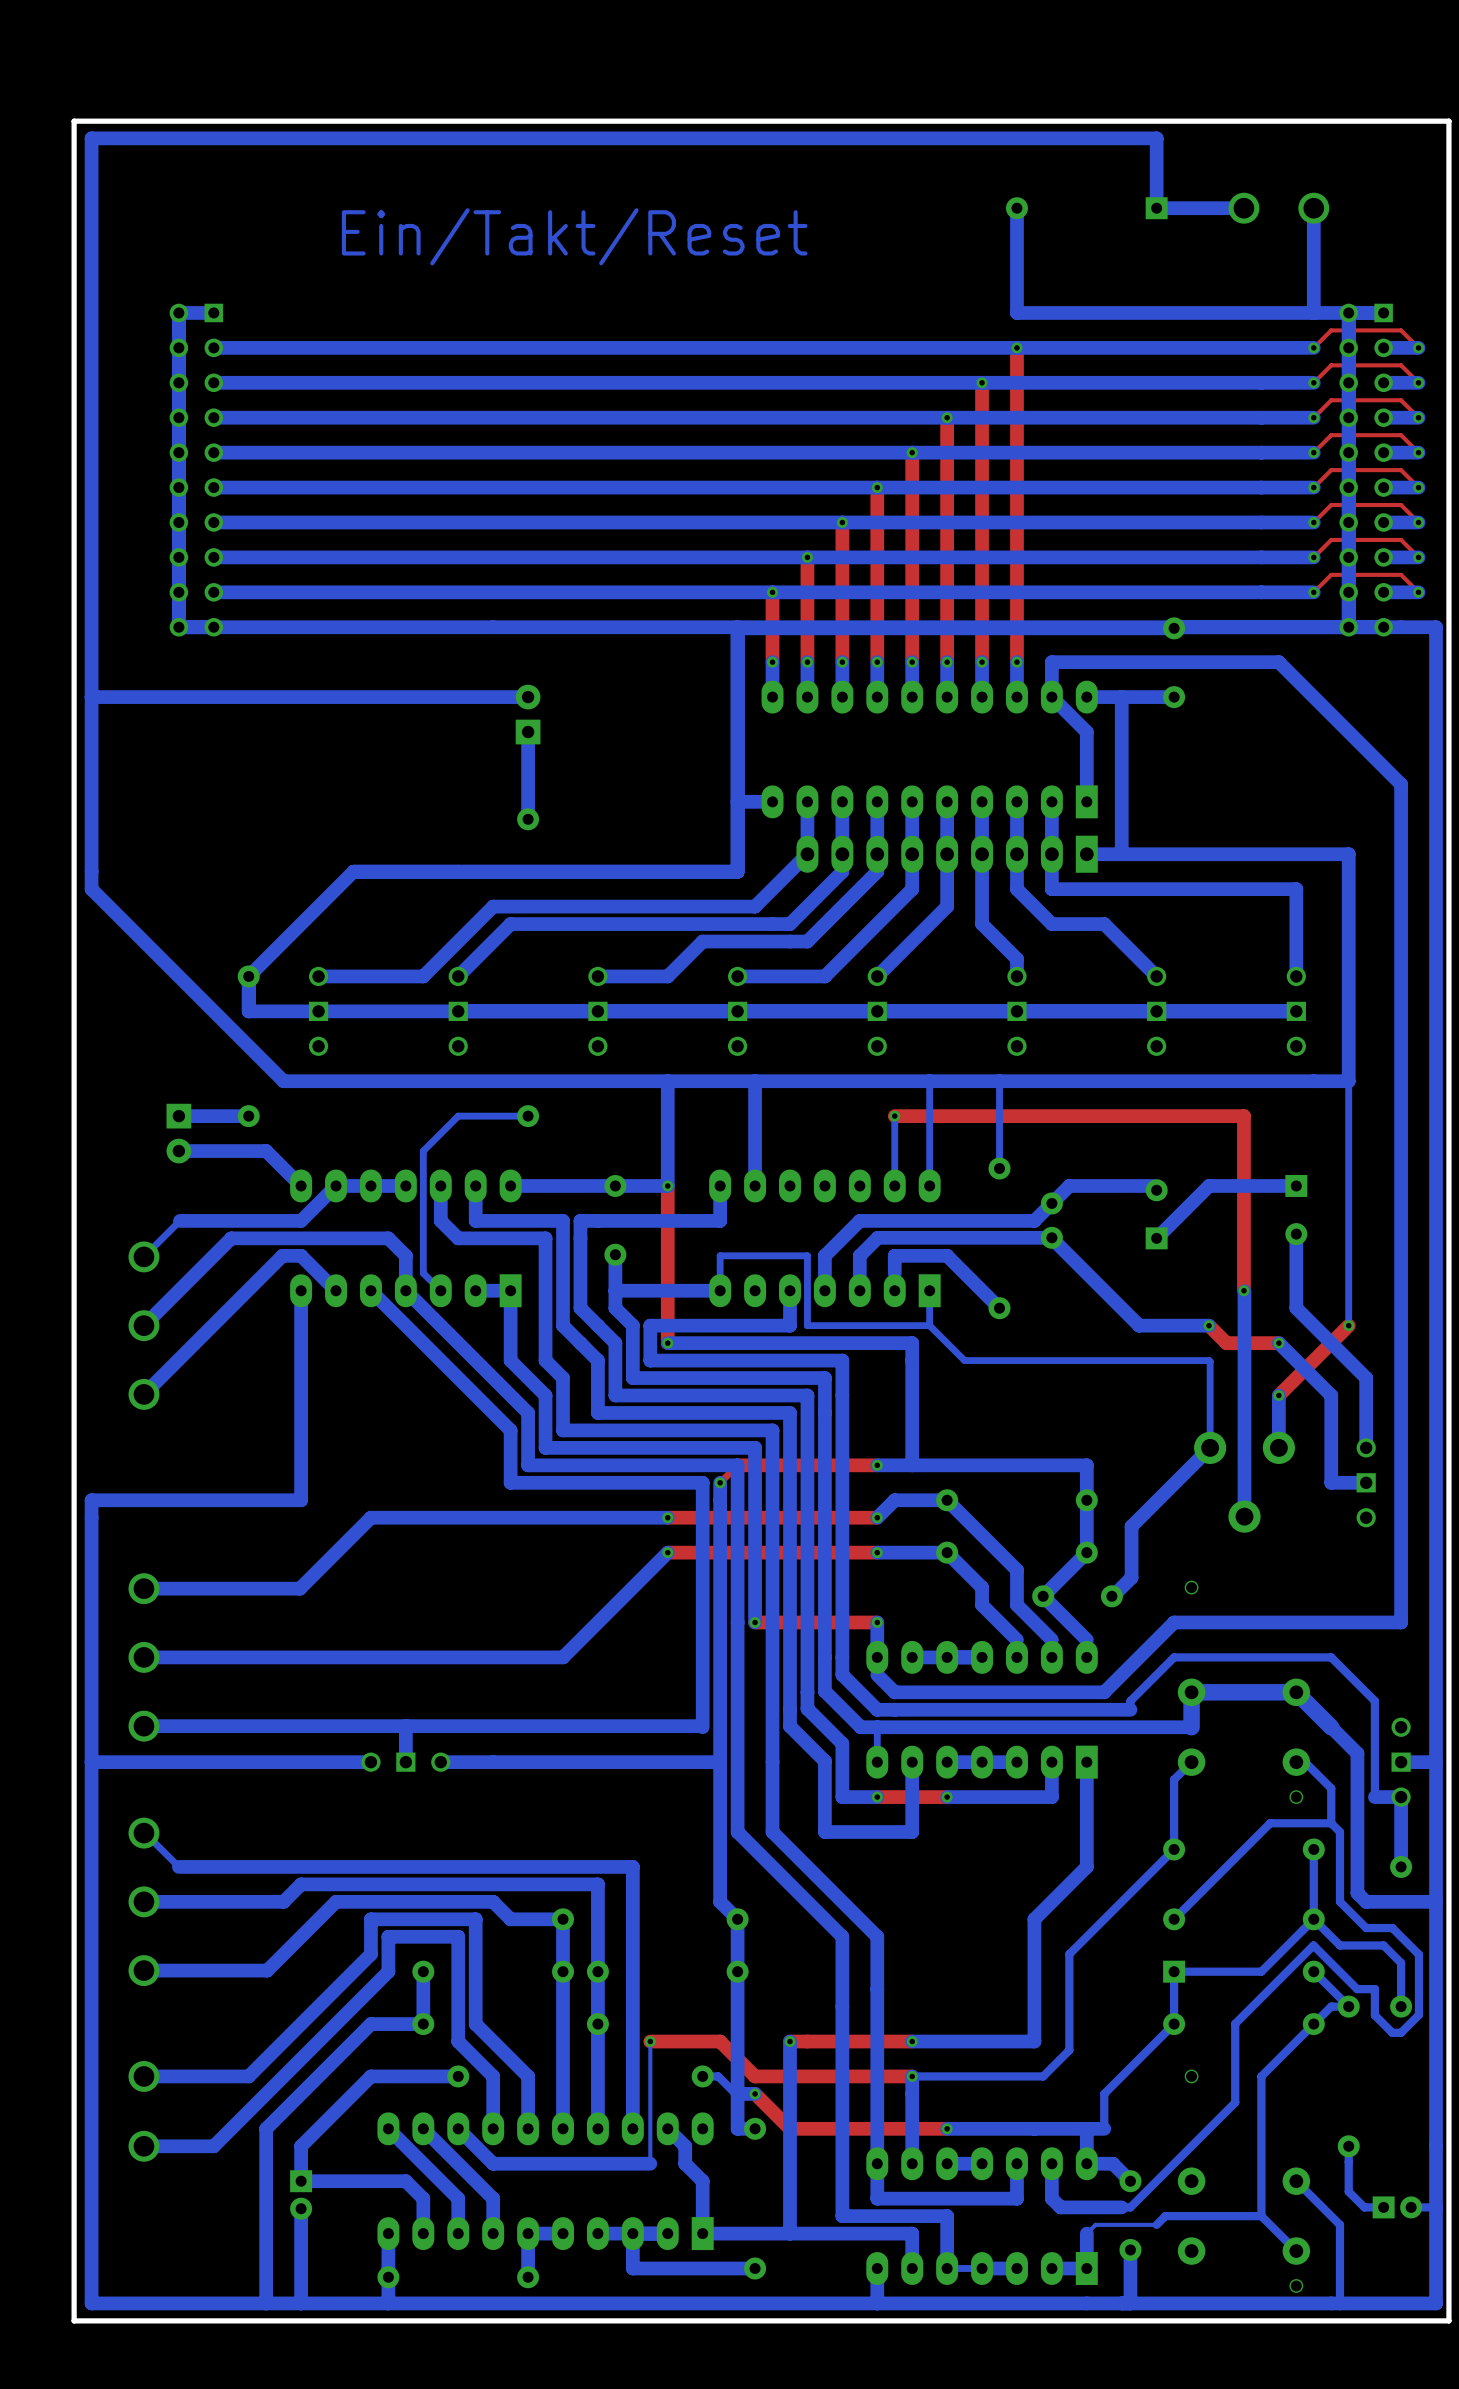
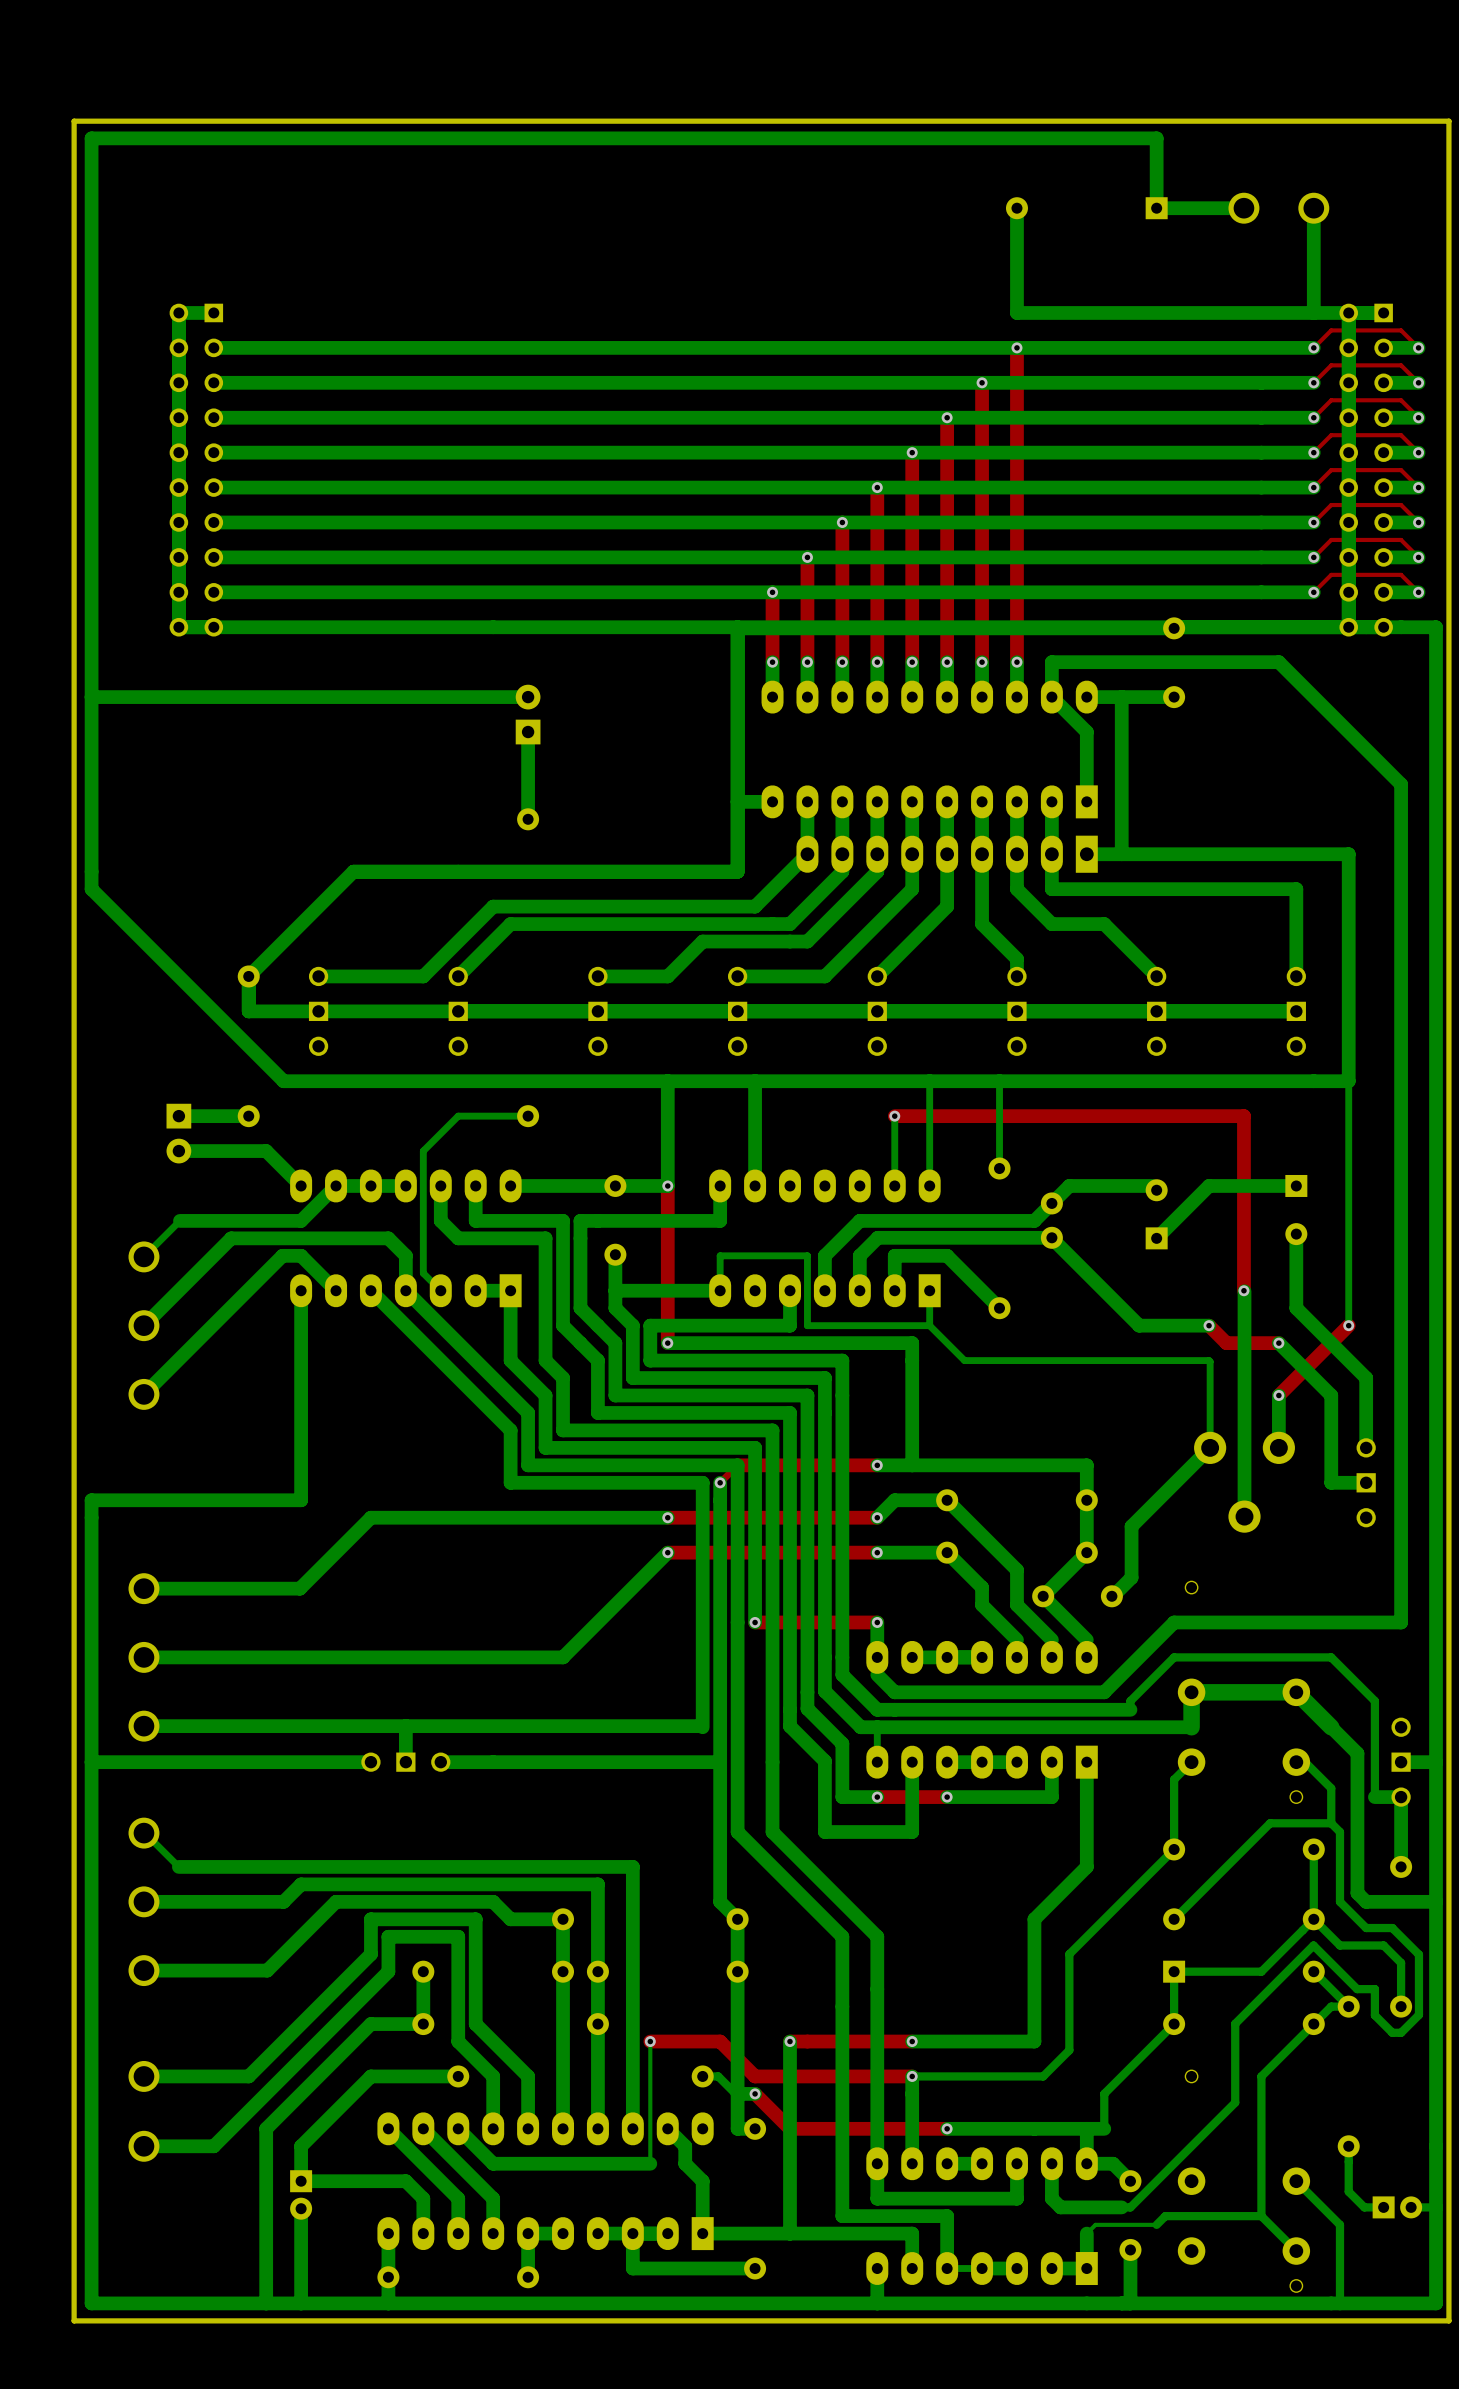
text: Ein/Takt/Reset (574, 236) -> none

